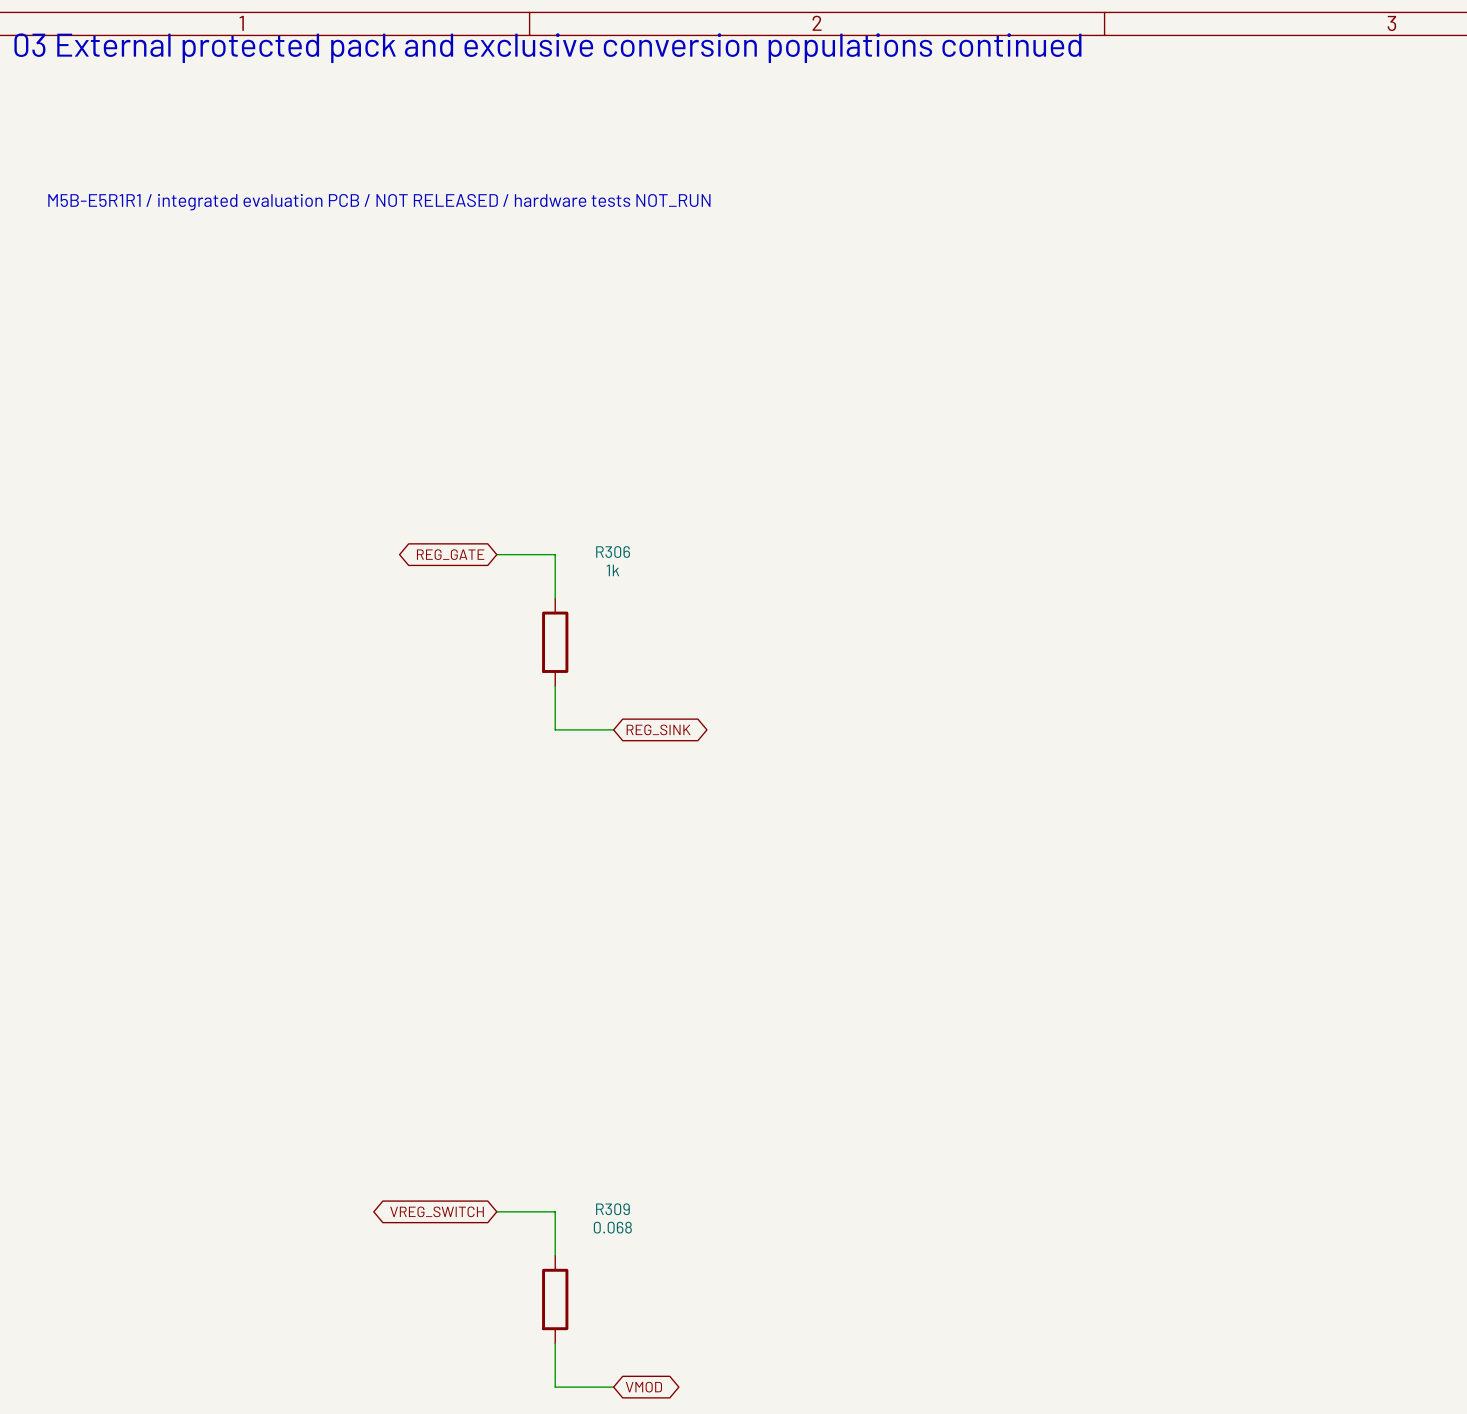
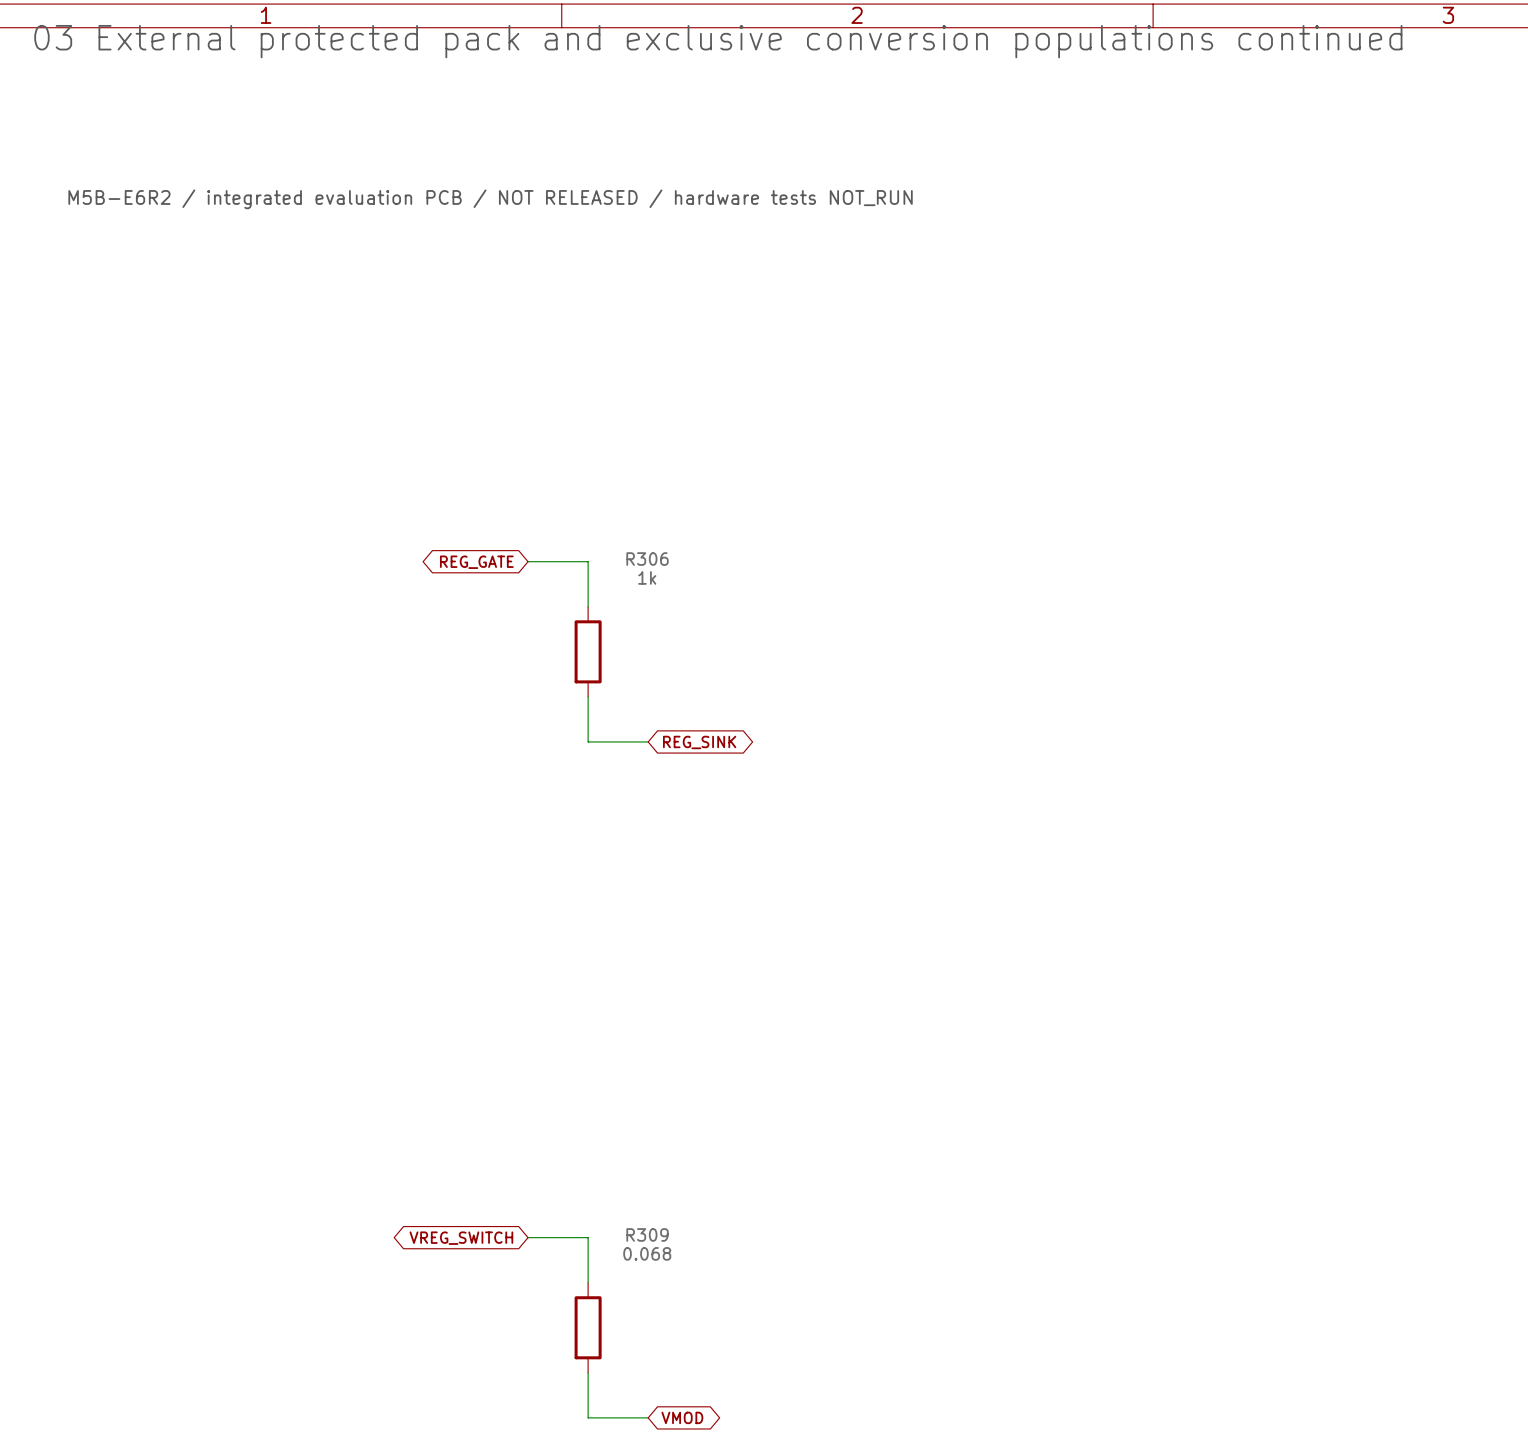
text: M5B-E5R1R1 / integrated evaluation PCB / NOT RELEASED / hardware tests NOT_RUN (379, 202) -> M5B-E6R2 / integrated evaluation PCB / NOT RELEASED / hardware tests NOT_RUN (490, 199)

